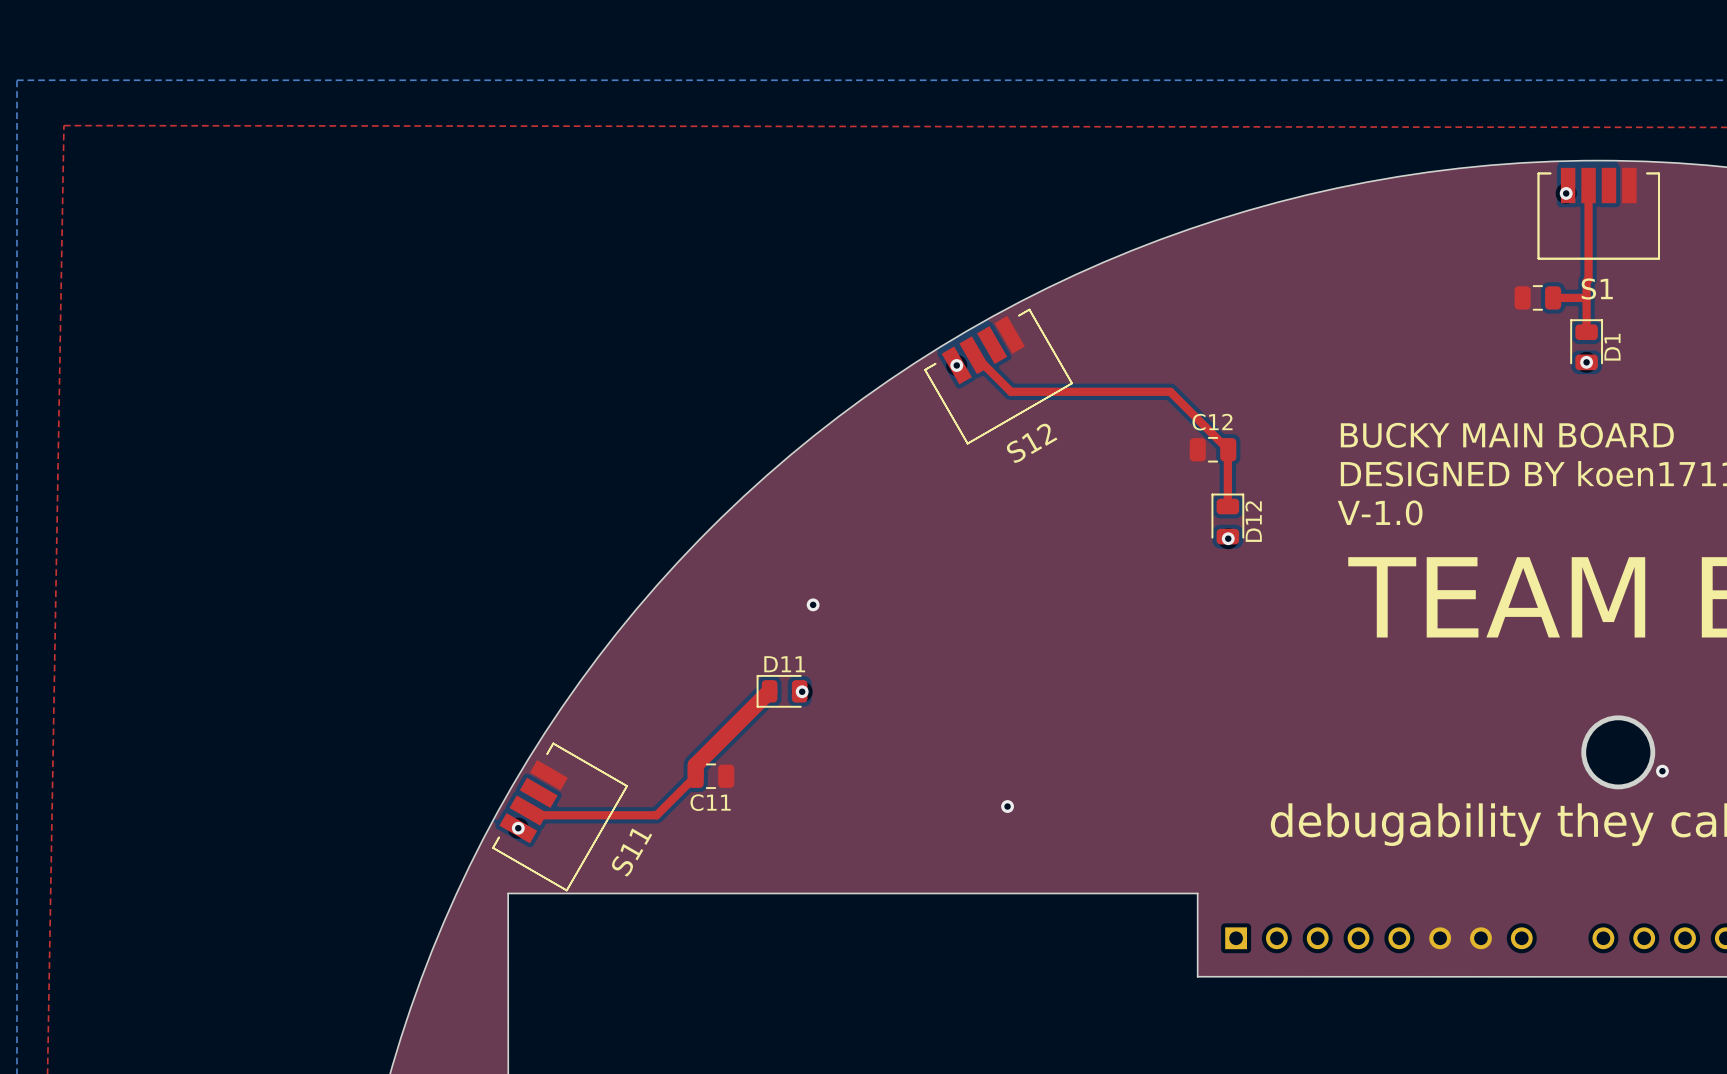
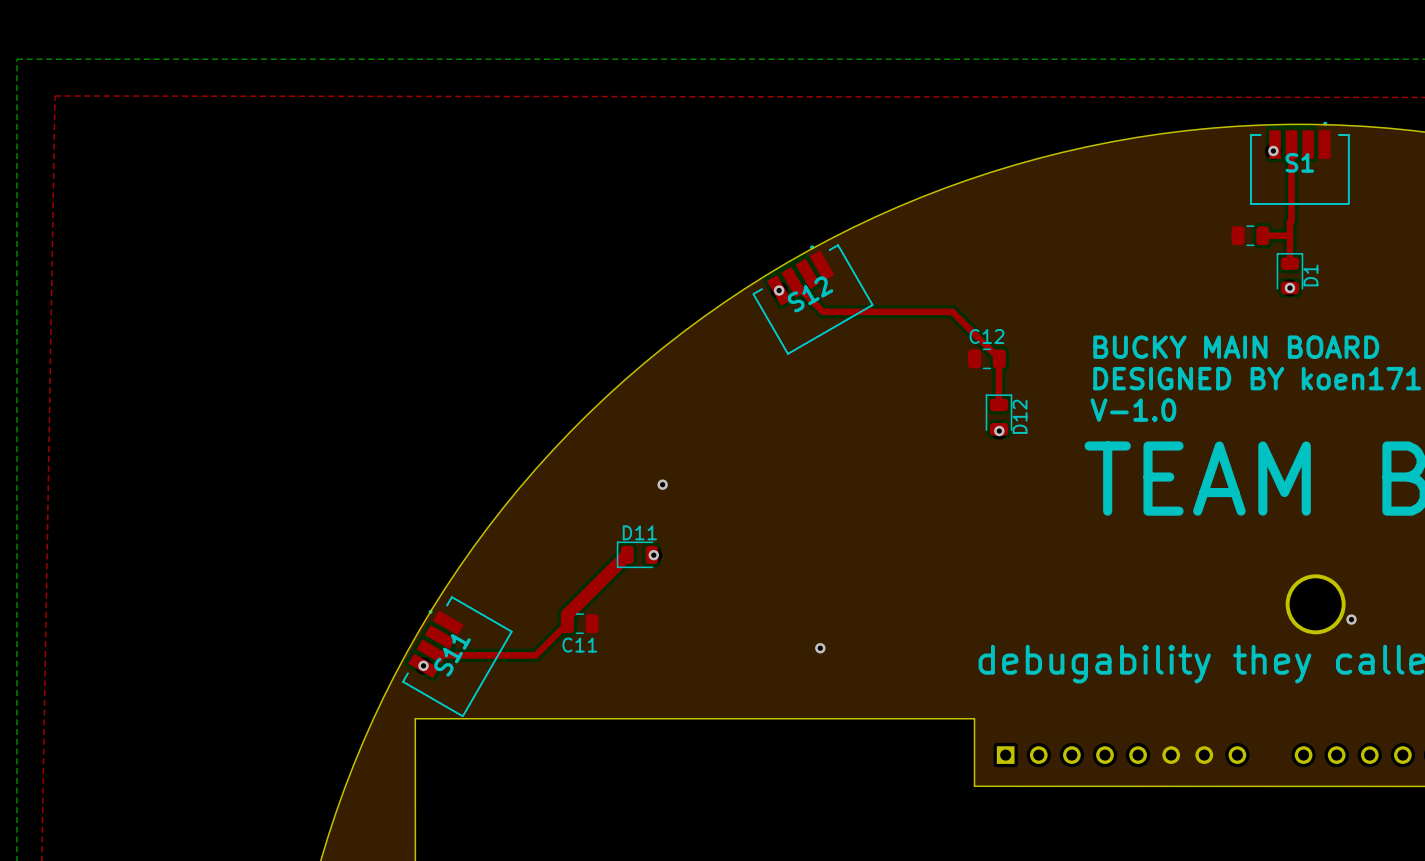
S1 footprint: [1537, 167, 1660, 260] -> [1250, 121, 1350, 205]
S1 name position: S1 (1597, 289) -> S1 (1299, 162)
S12 footprint: [924, 308, 1073, 445] -> [752, 244, 874, 355]
S12 name position: S12 (1031, 443) -> S12 (810, 294)
S11 footprint: [492, 742, 628, 892] -> [402, 596, 513, 717]
S11 name position: S11 (631, 852) -> S11 (452, 655)

